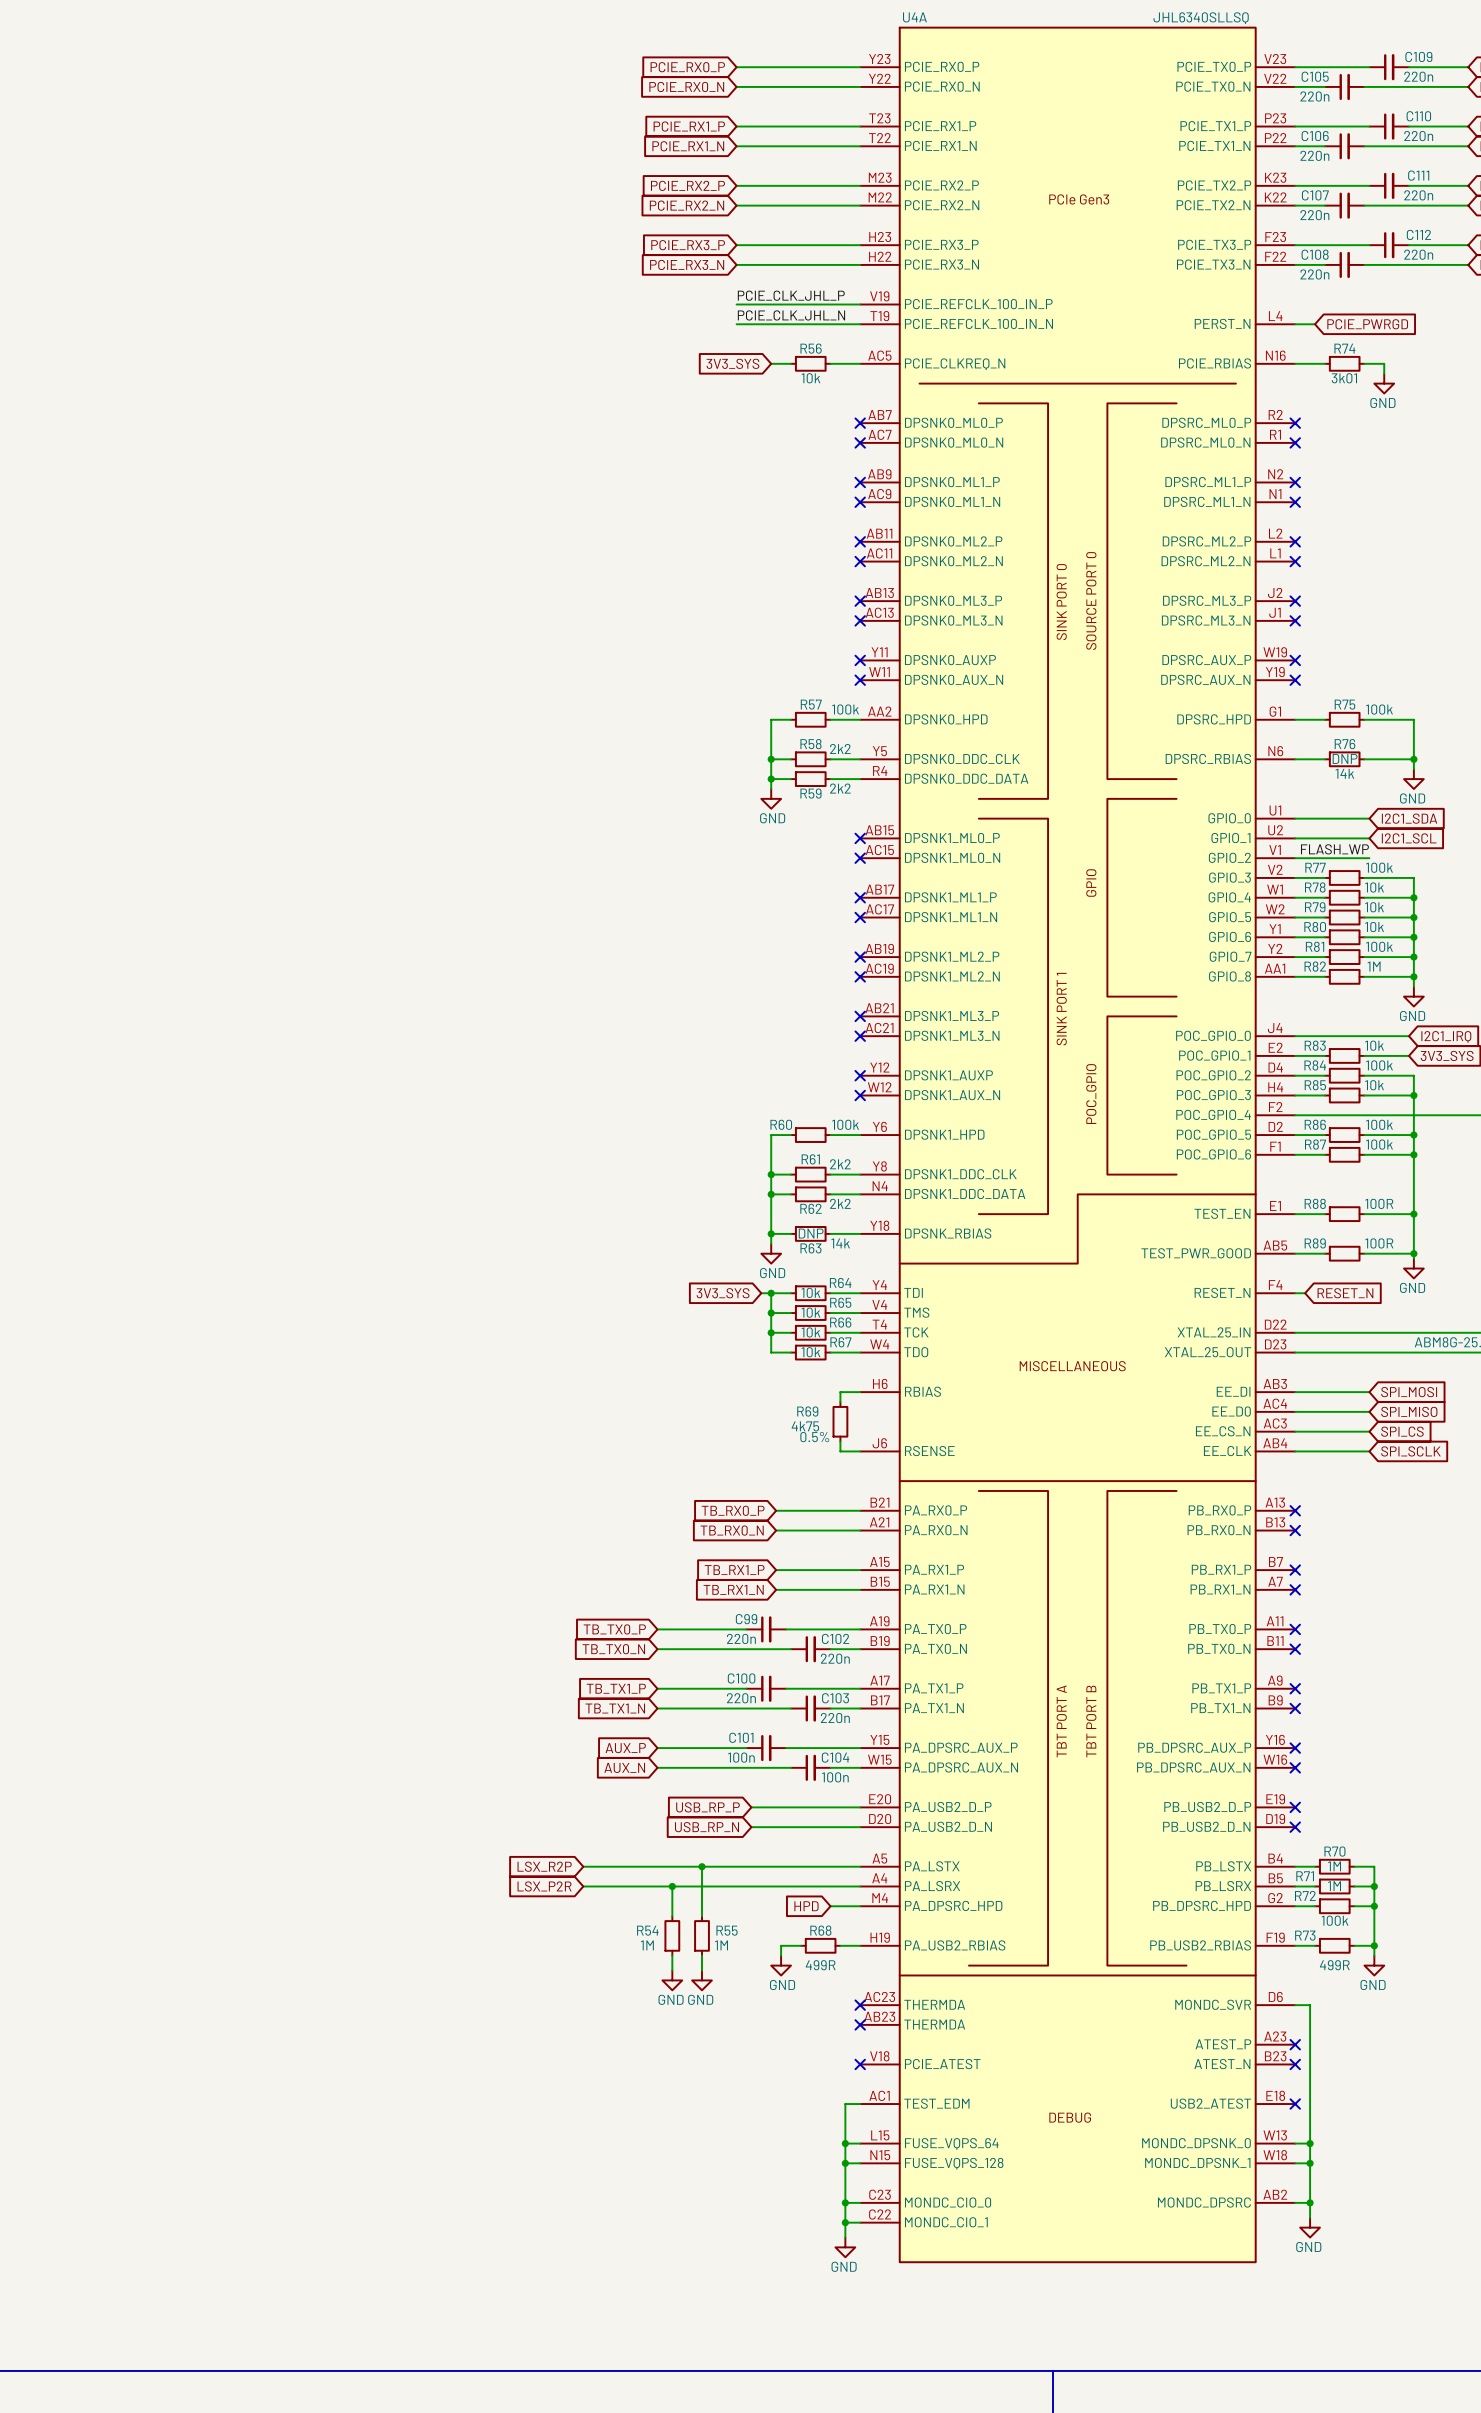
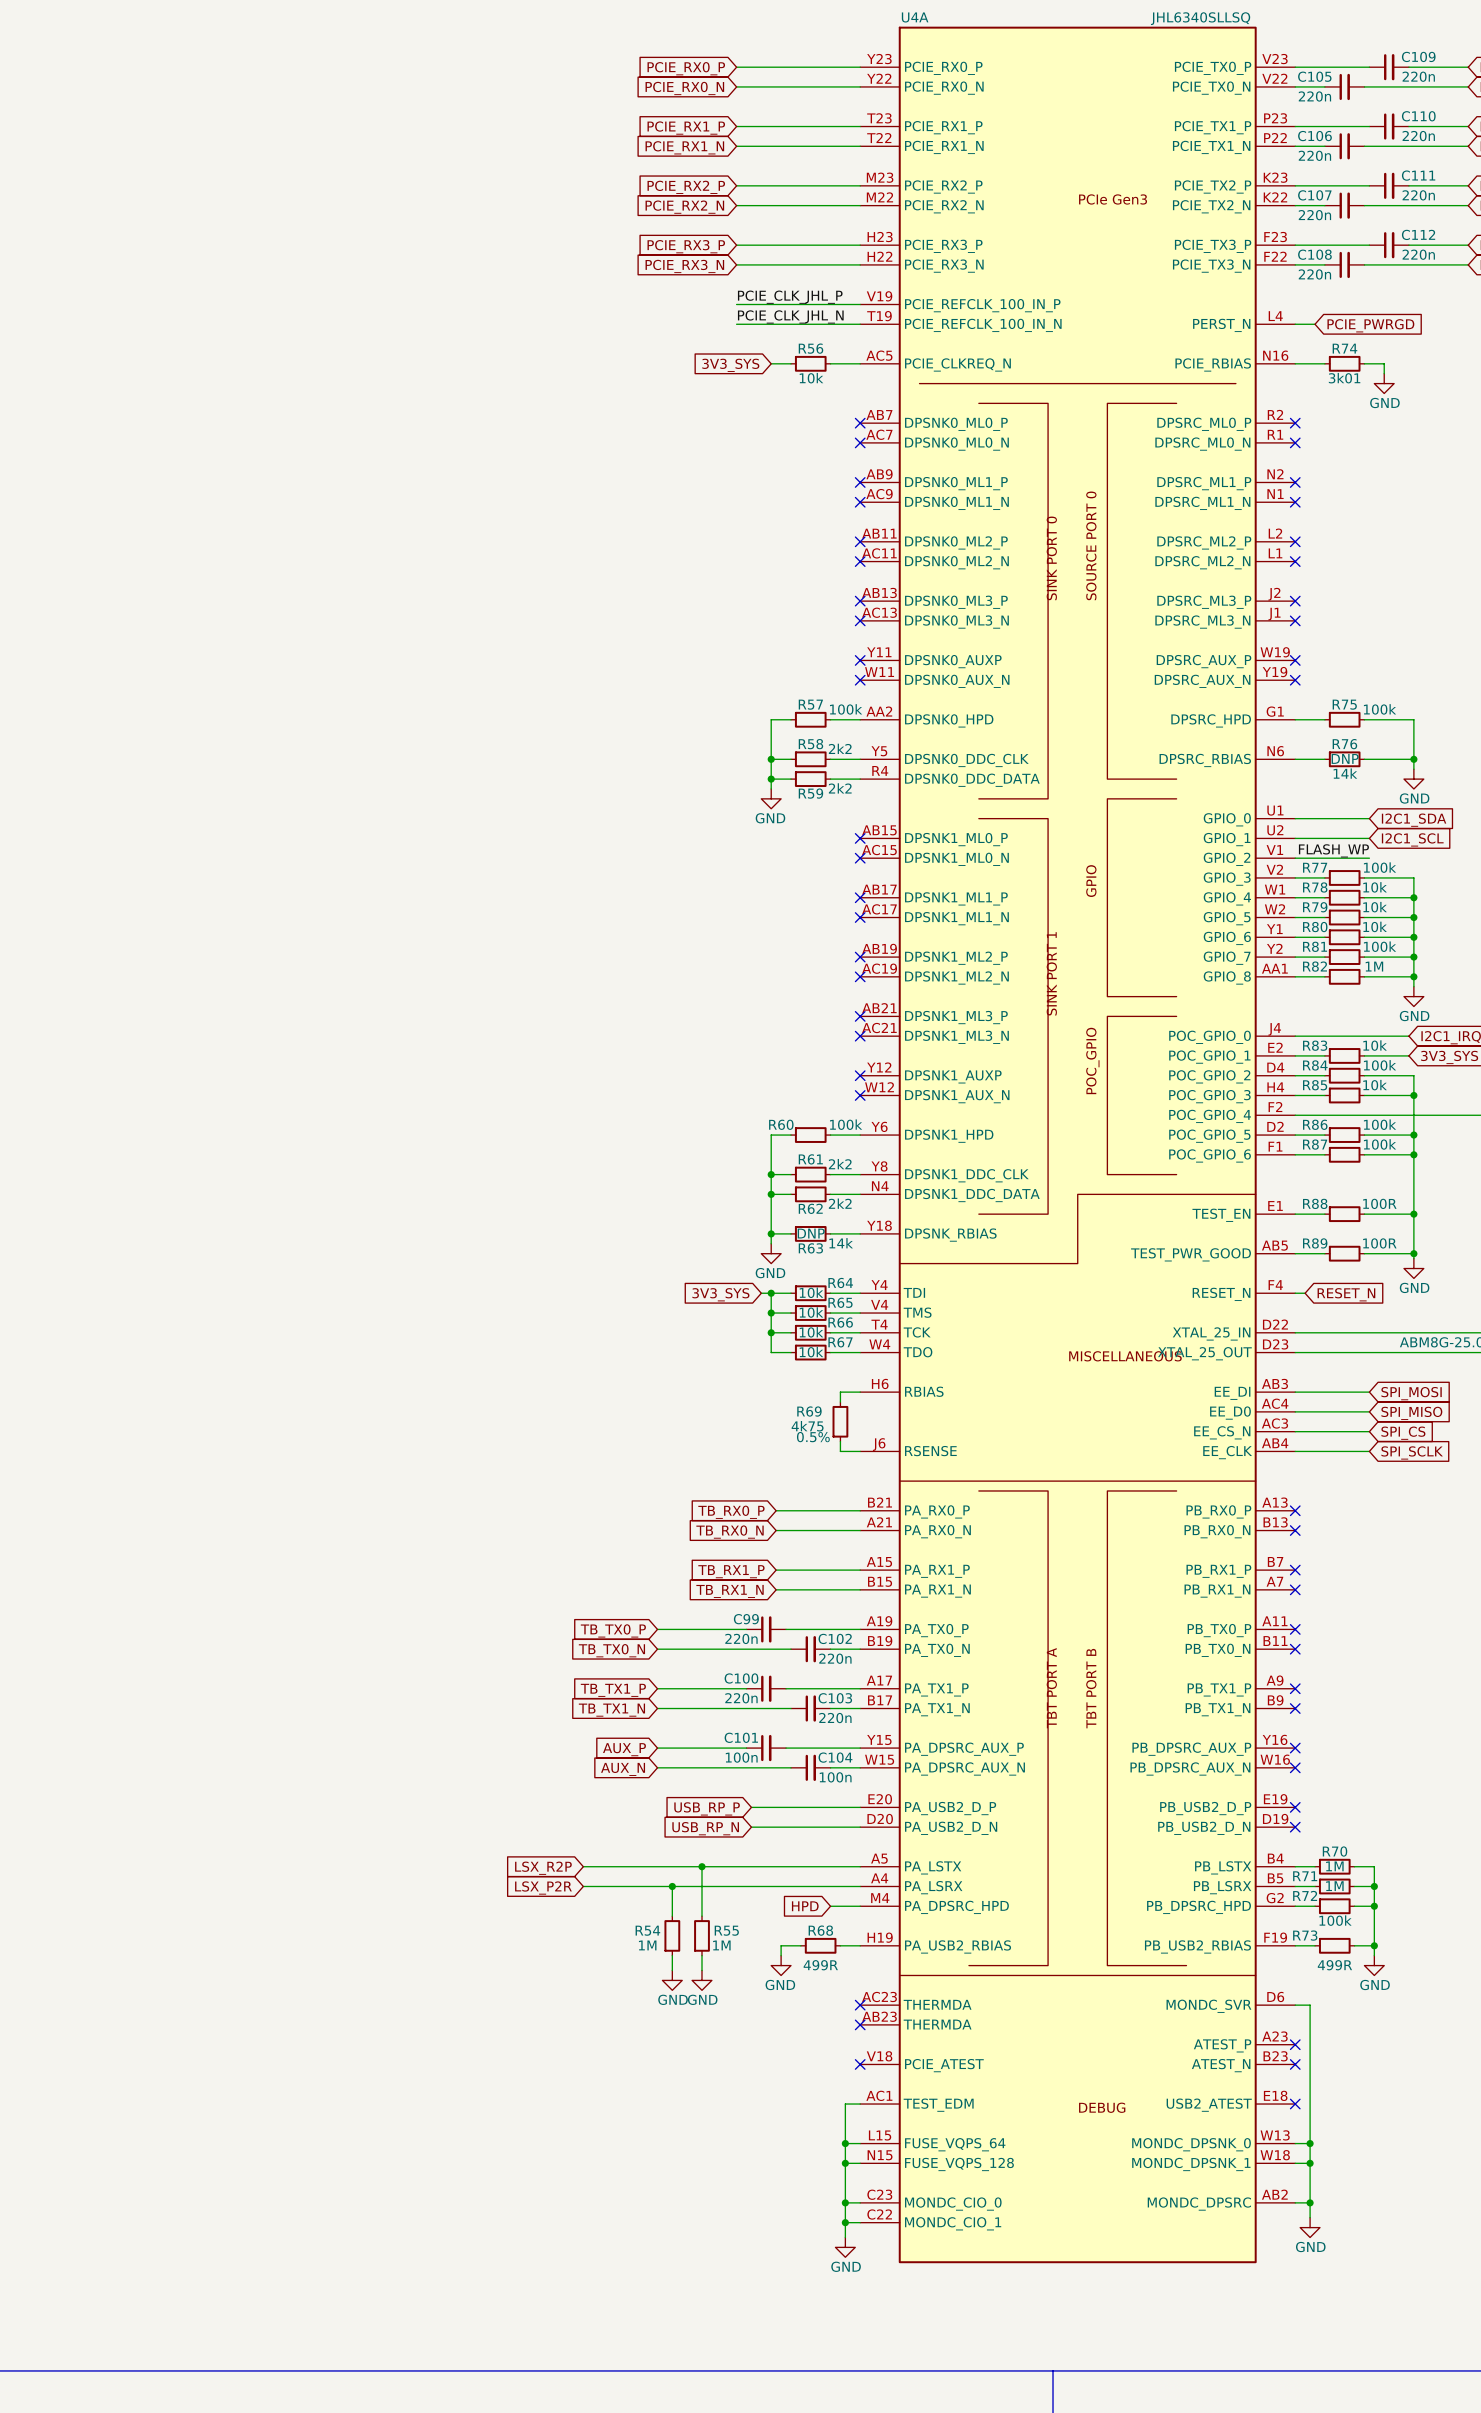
U4A symbol: [860, 26, 1296, 2264] -> [860, 26, 1296, 2264]

